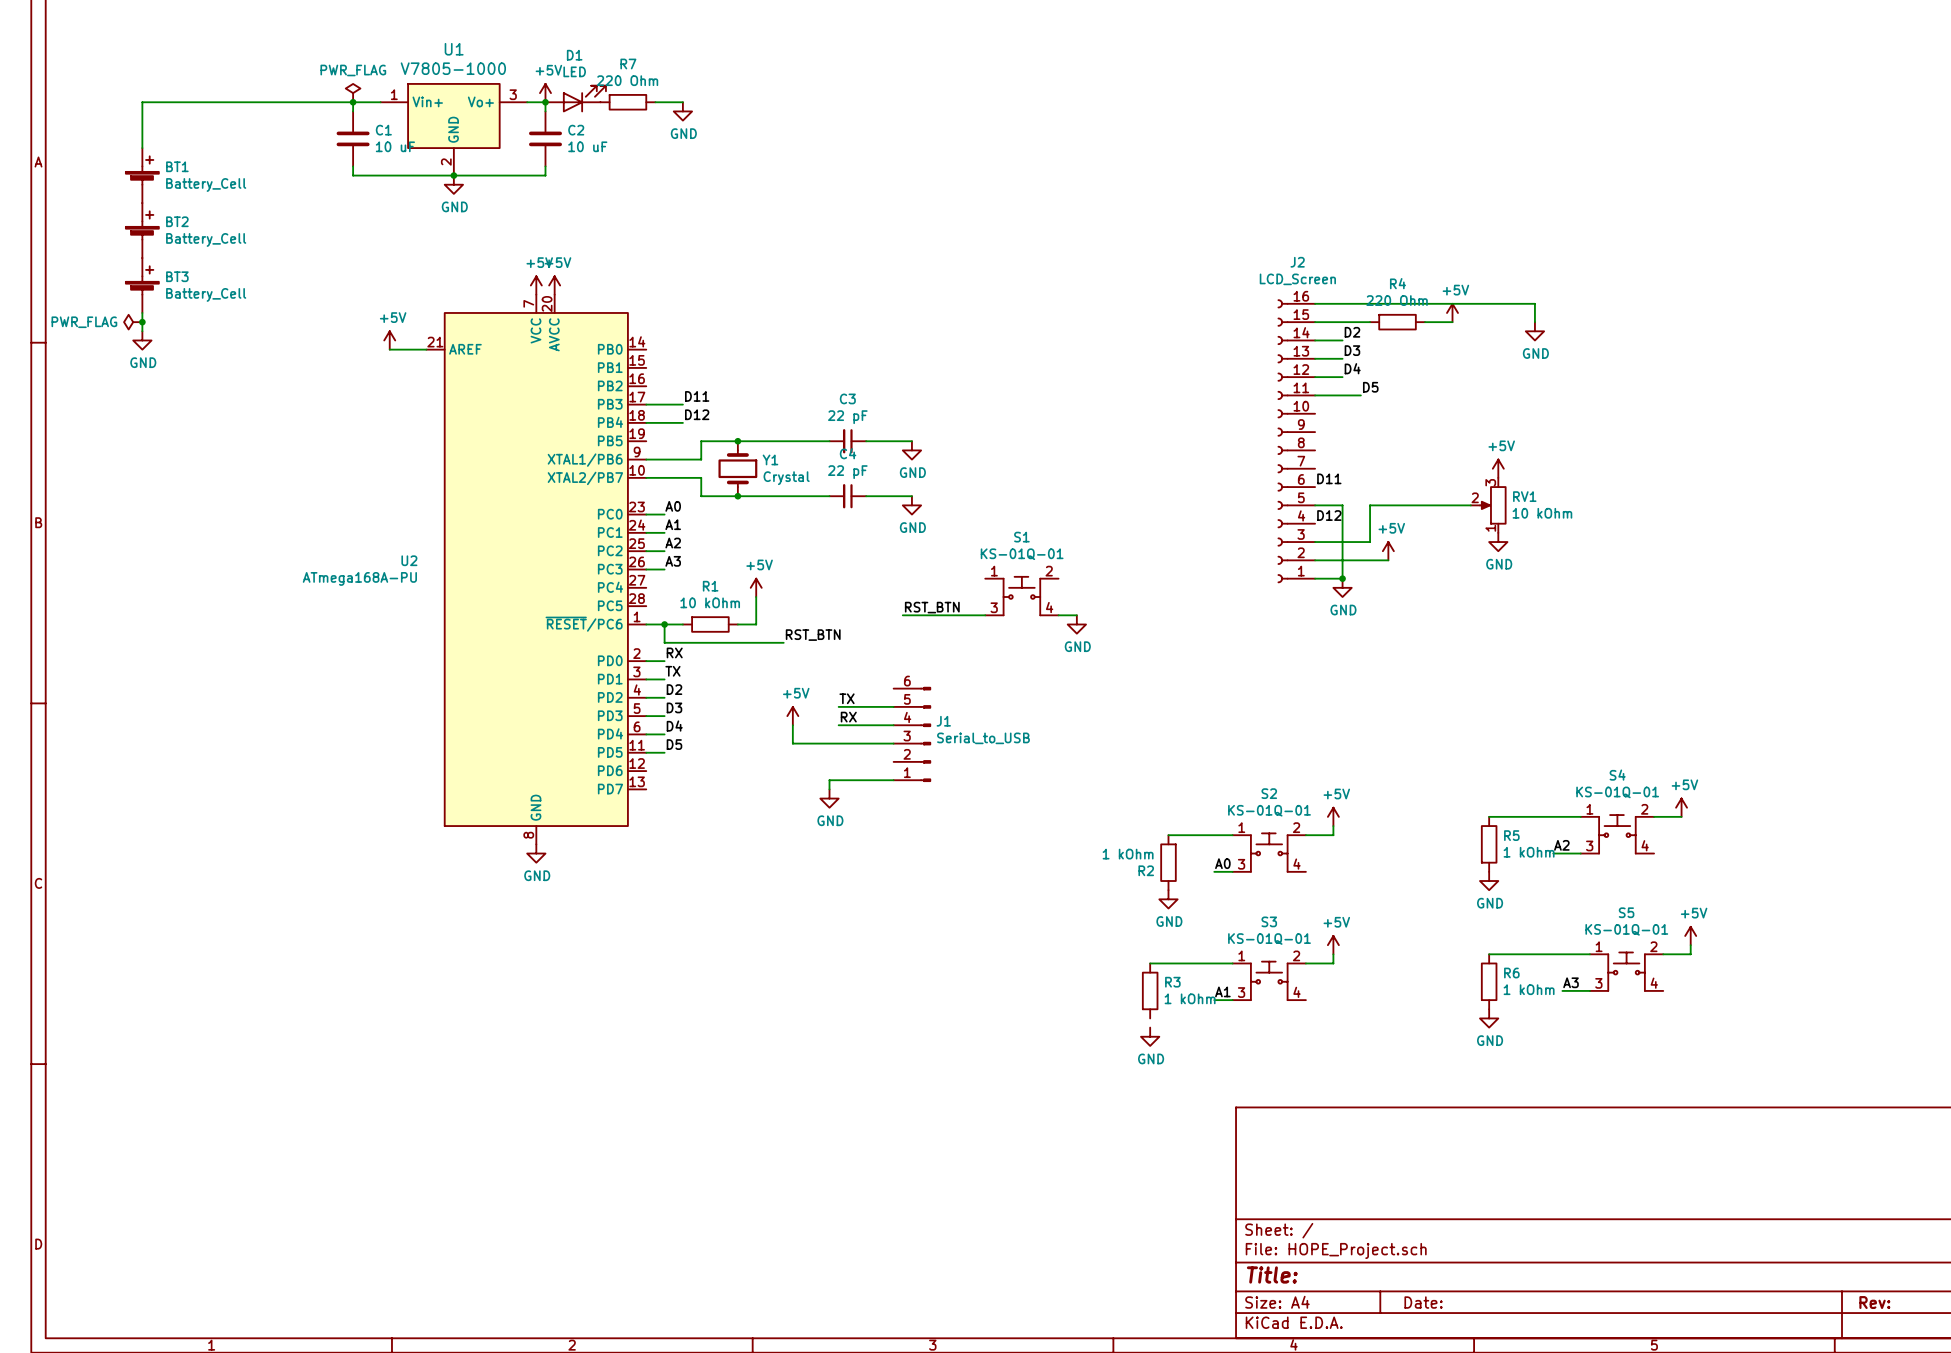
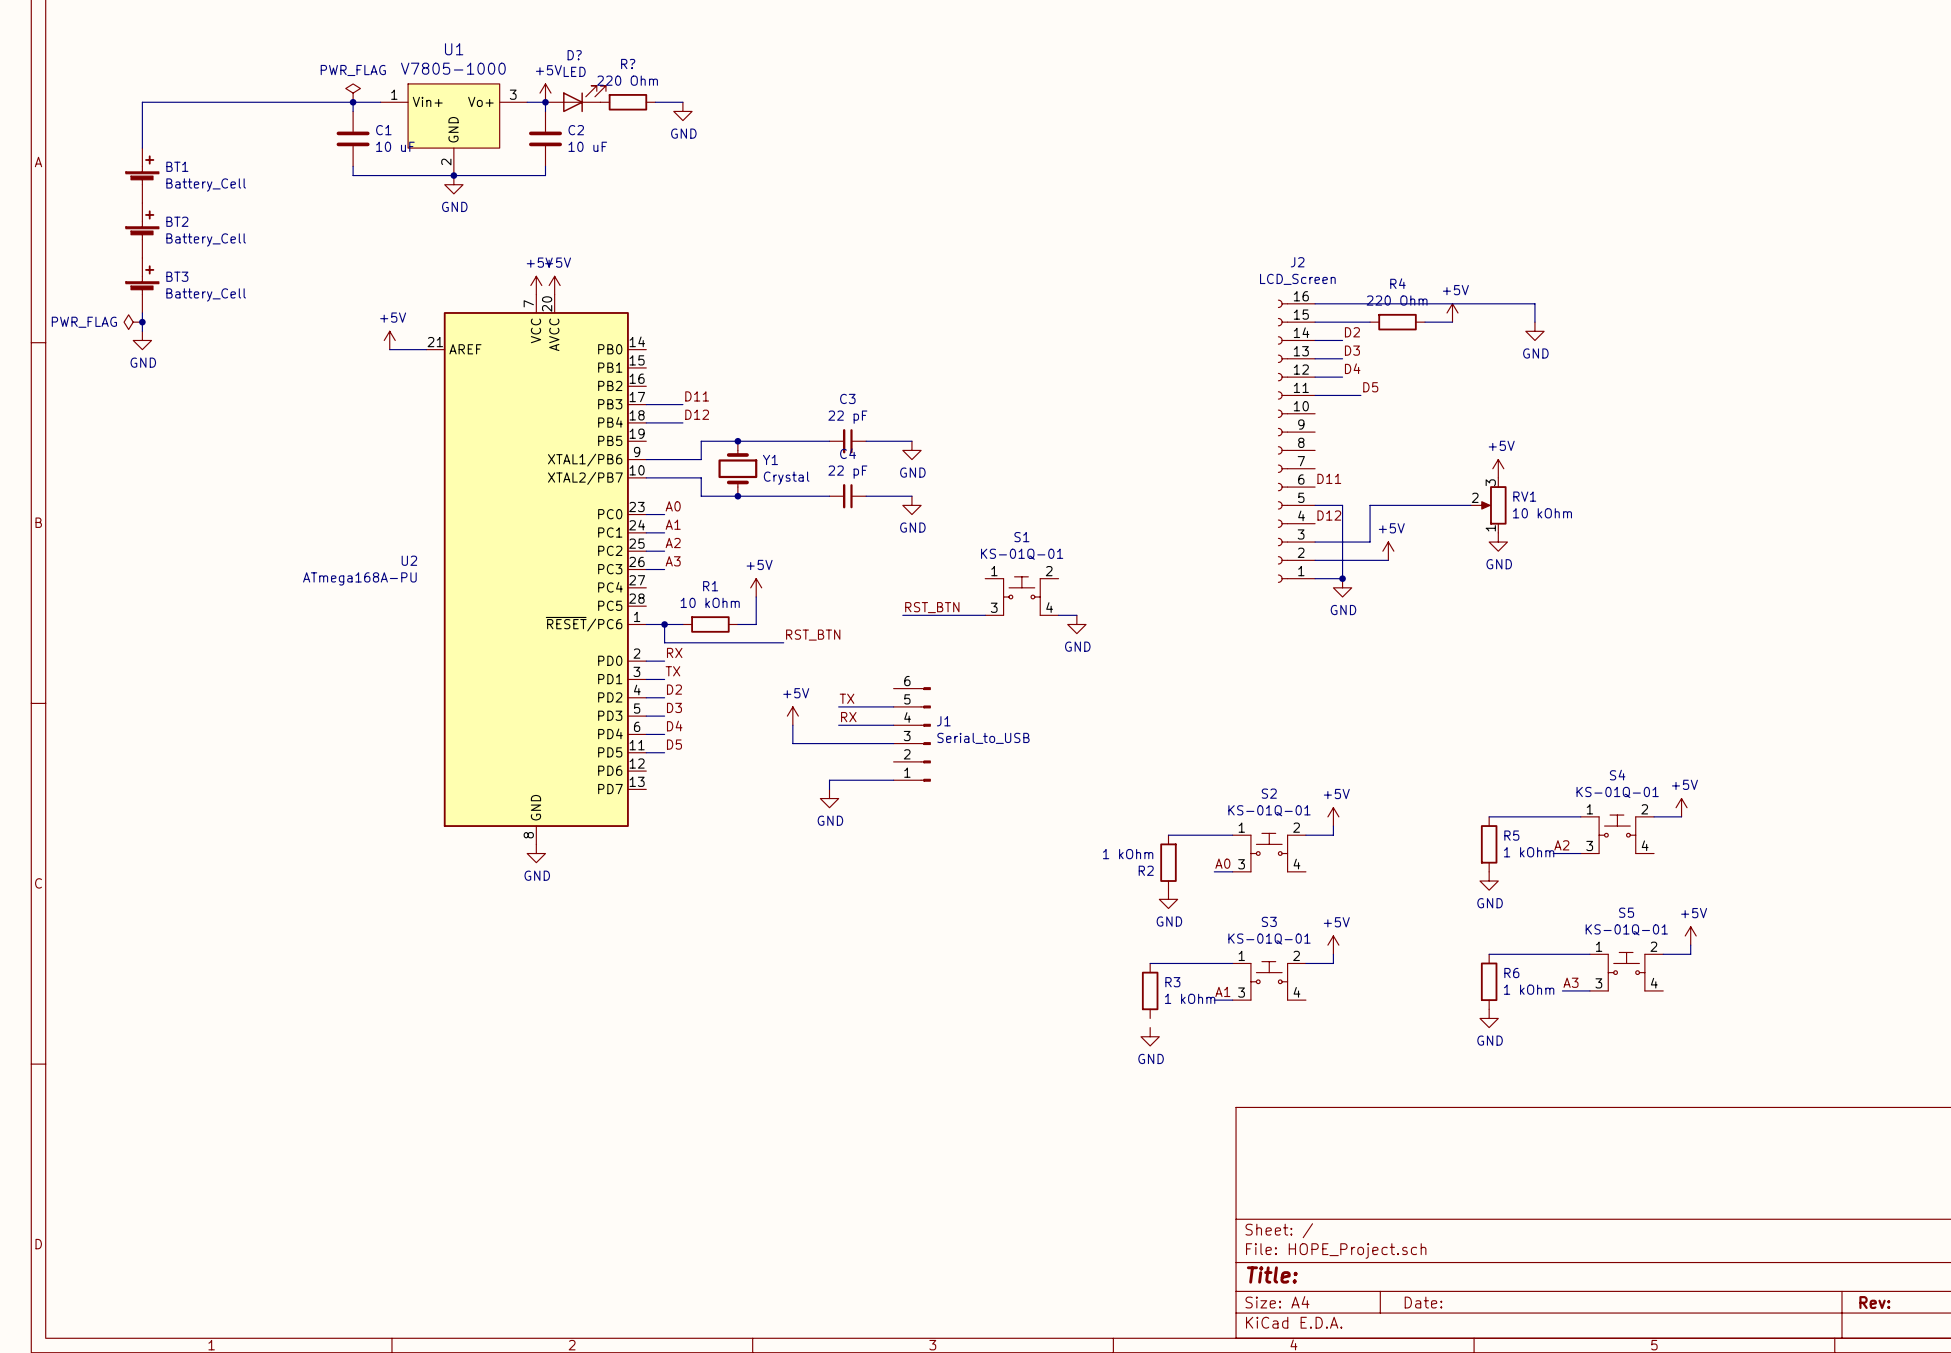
D1 name: D1 (574, 55) -> D? (574, 55)
R7 name: R7 (628, 63) -> R? (628, 63)

